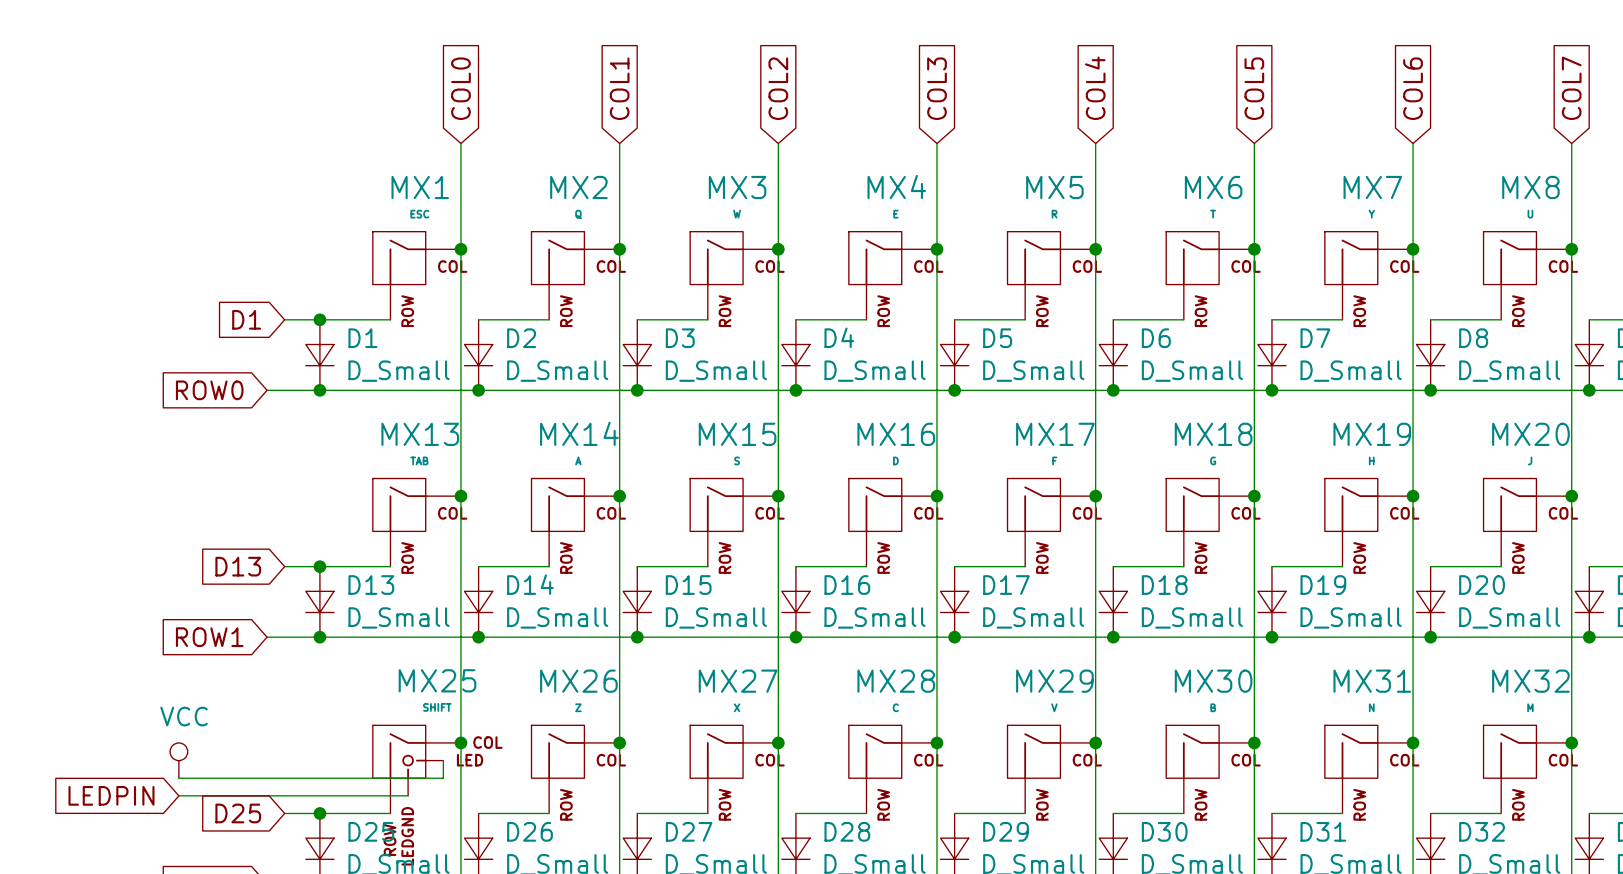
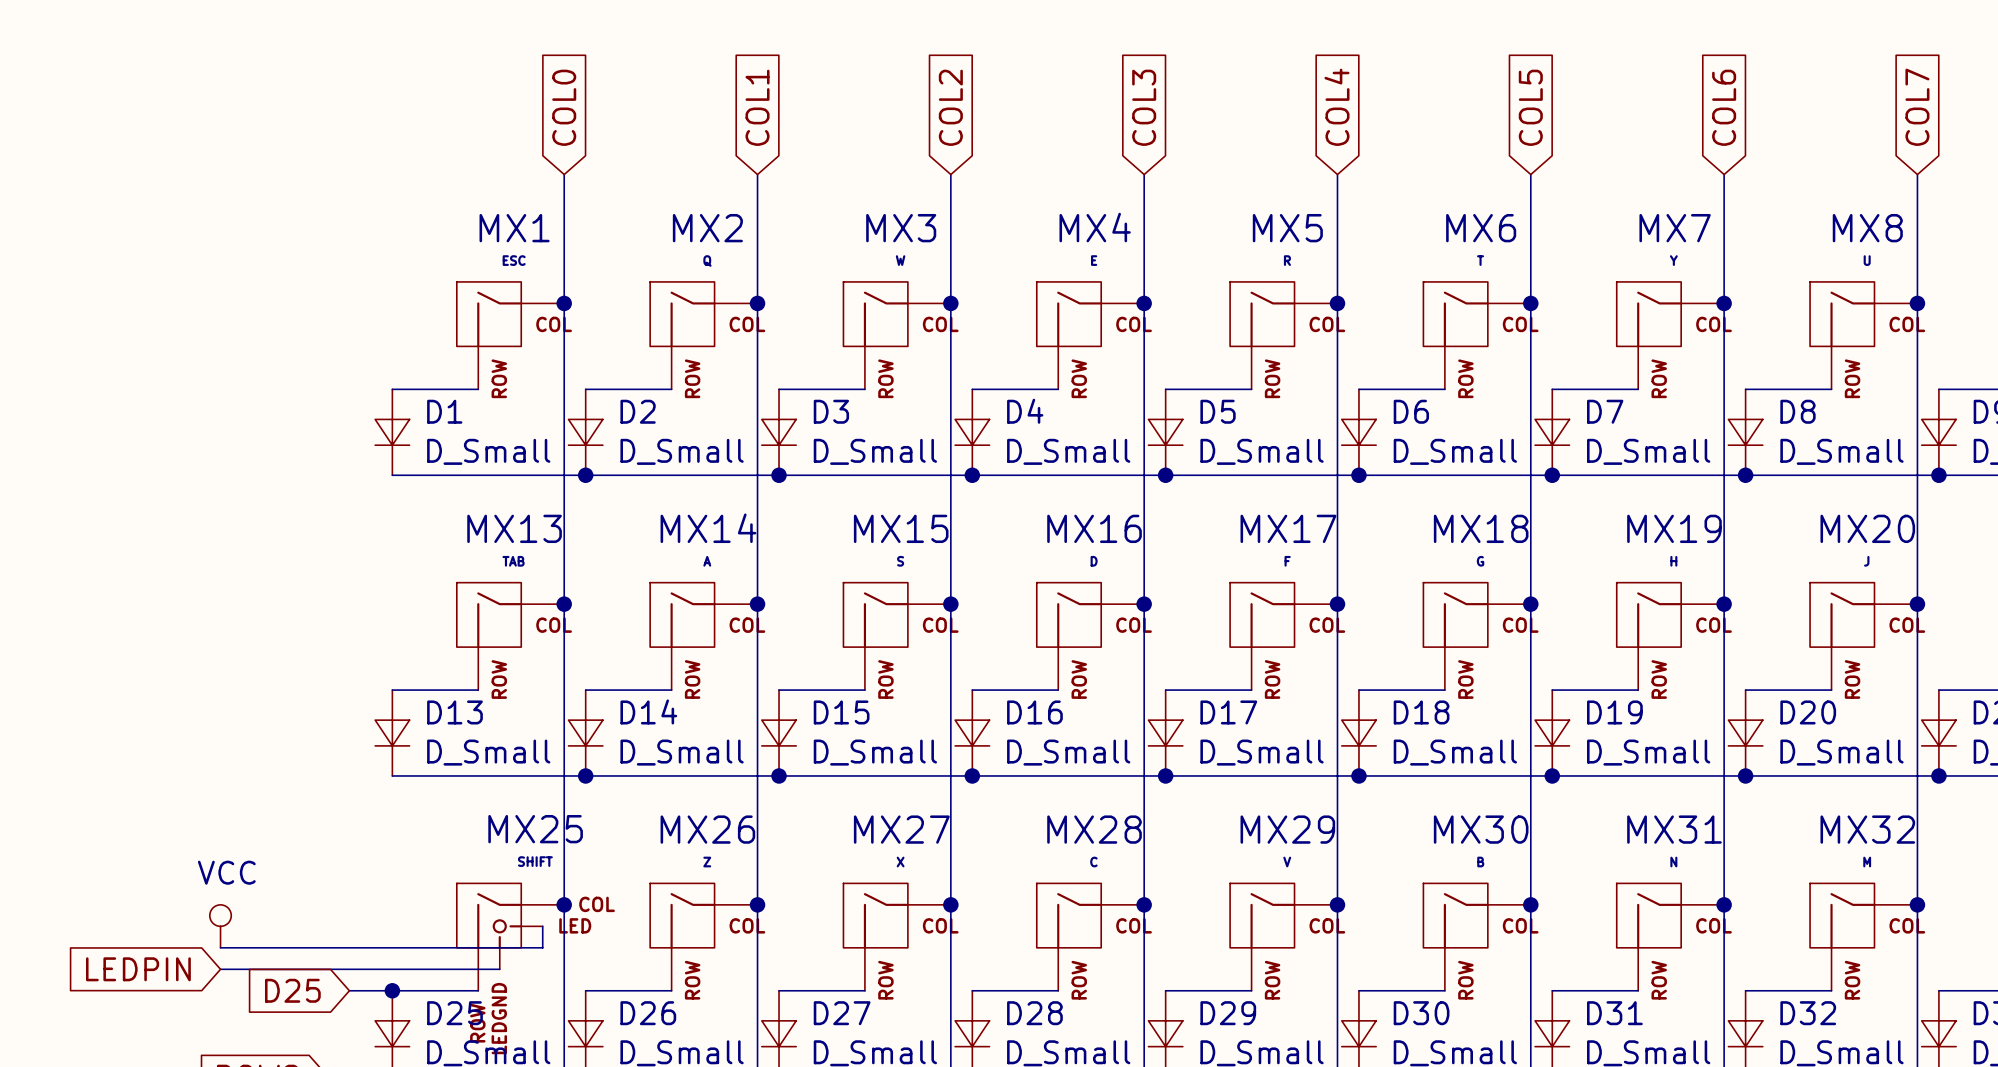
global label: D1 (246, 319) -> none
wire: (284, 319) (319, 319) -> none
junction: (319, 319) -> none
global label: ROW0 (209, 390) -> none
wire: (267, 390) (319, 390) -> none
junction: (319, 390) -> none
global label: D13 (238, 566) -> none
wire: (284, 566) (319, 566) -> none
junction: (319, 566) -> none
global label: ROW1 (209, 637) -> none
wire: (267, 637) (319, 637) -> none
junction: (319, 637) -> none

